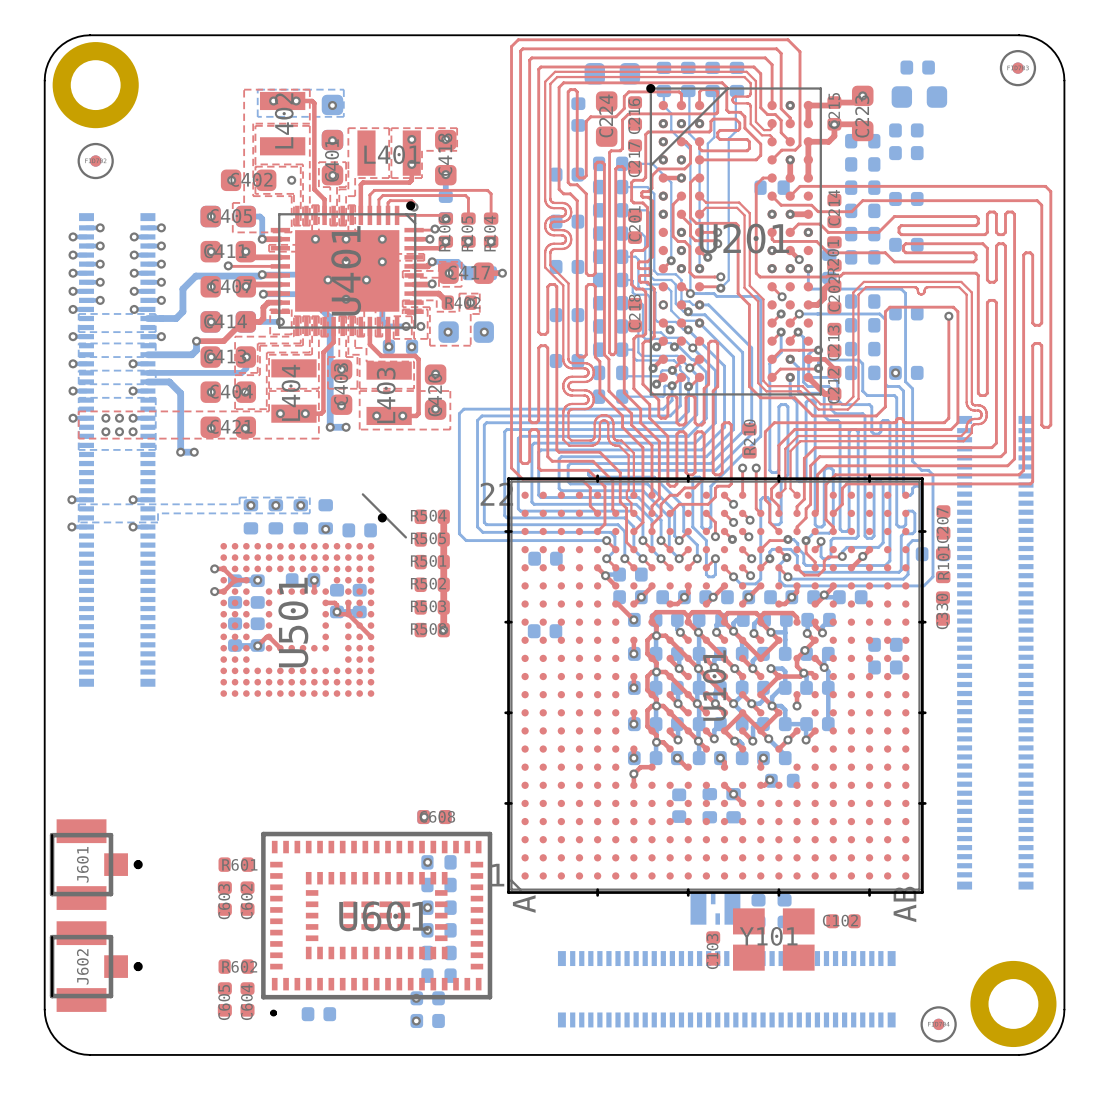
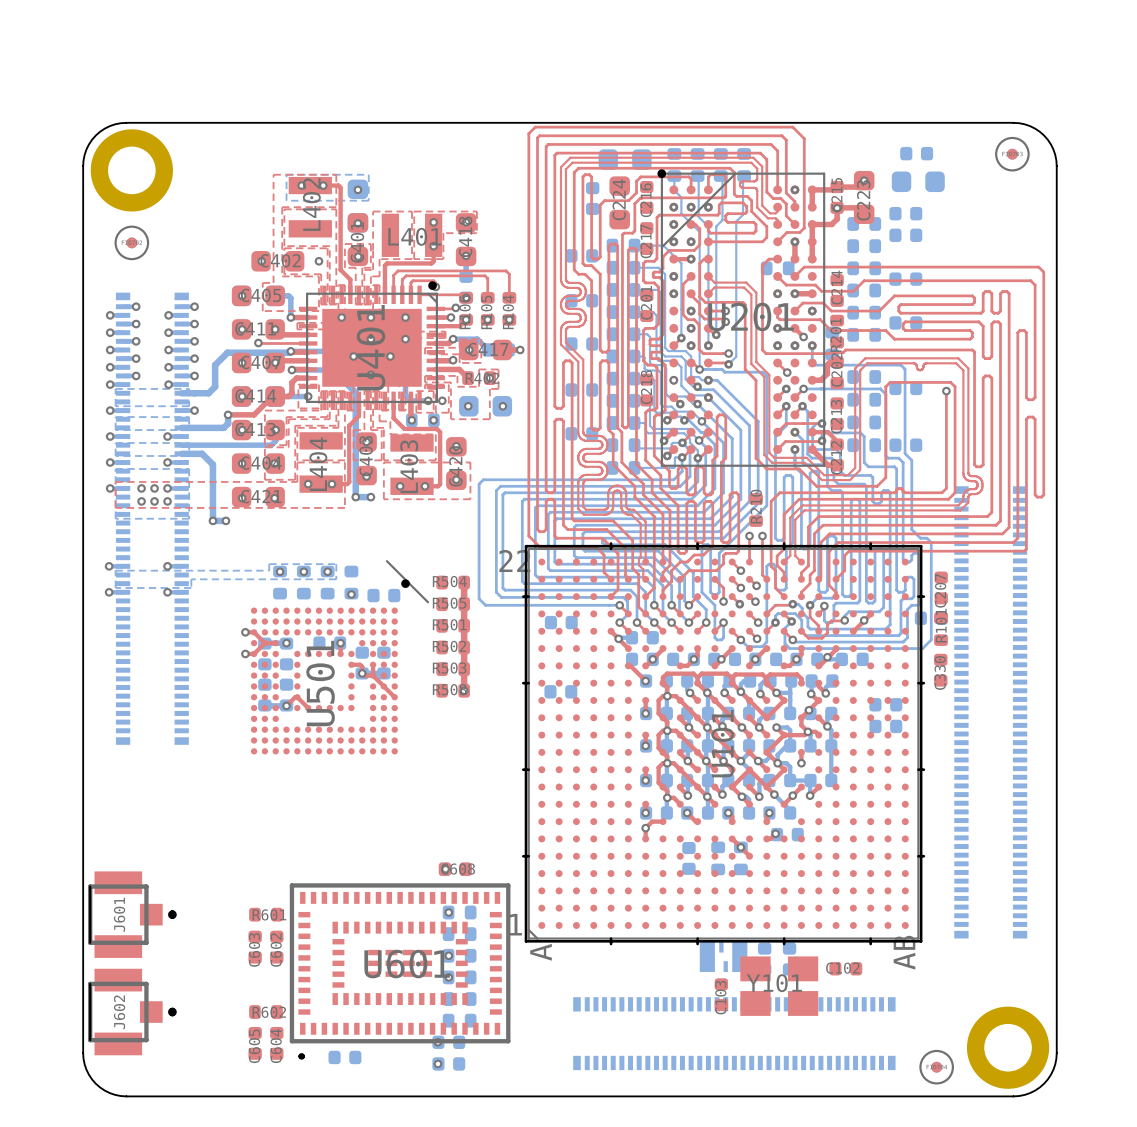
via: (895, 372) -> none

